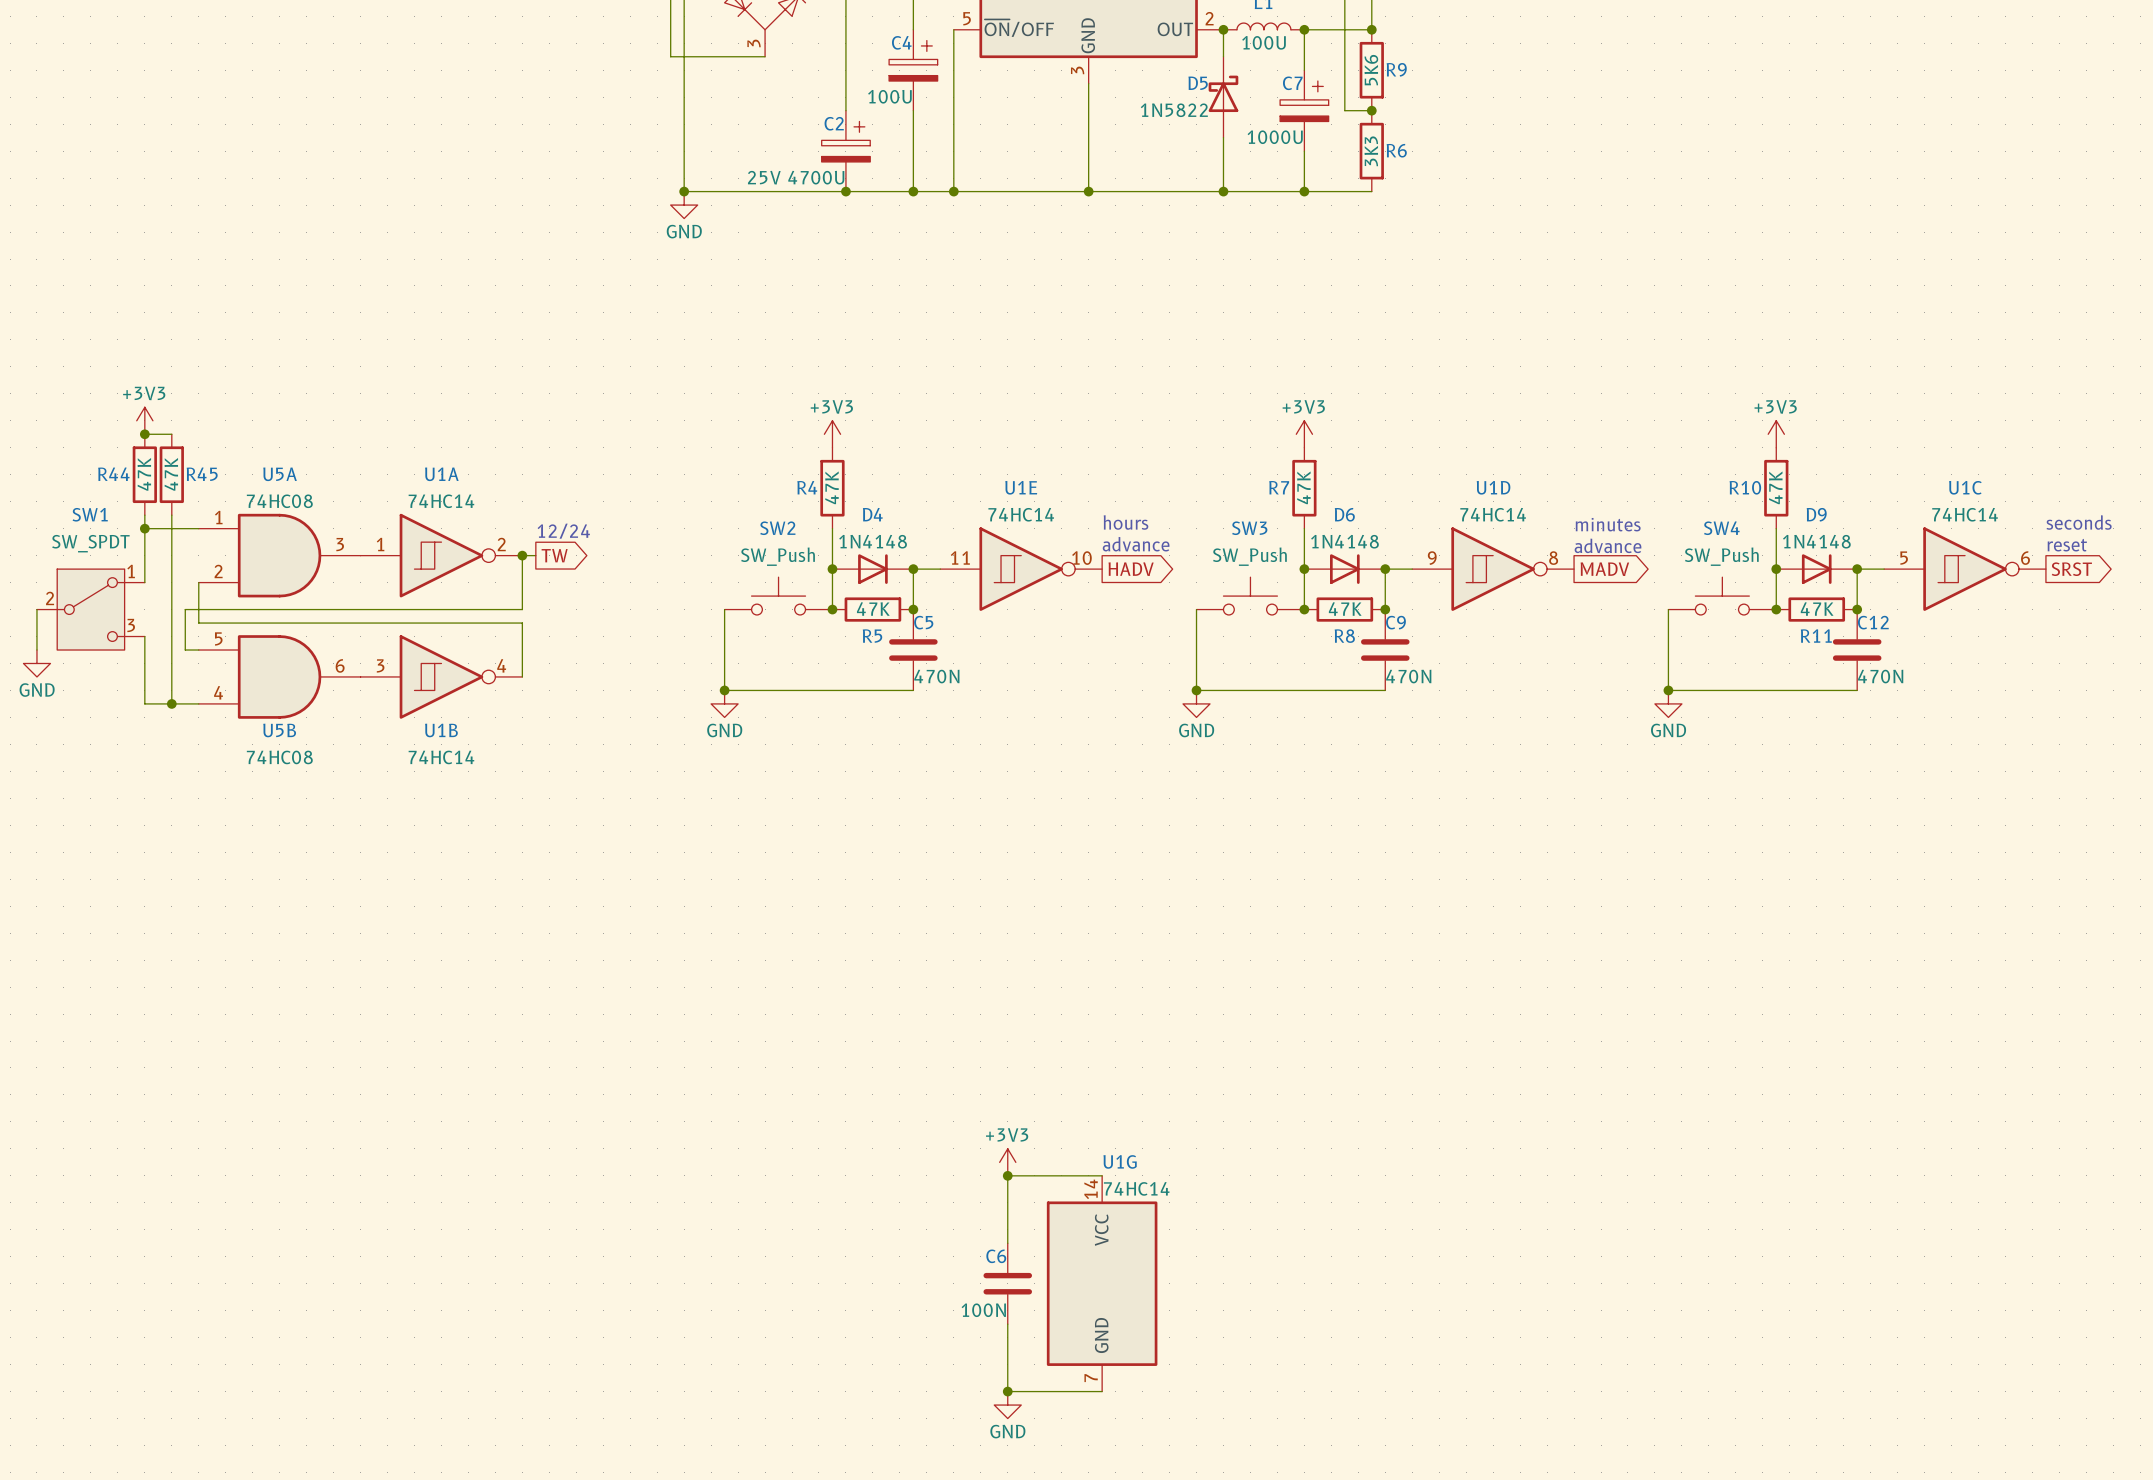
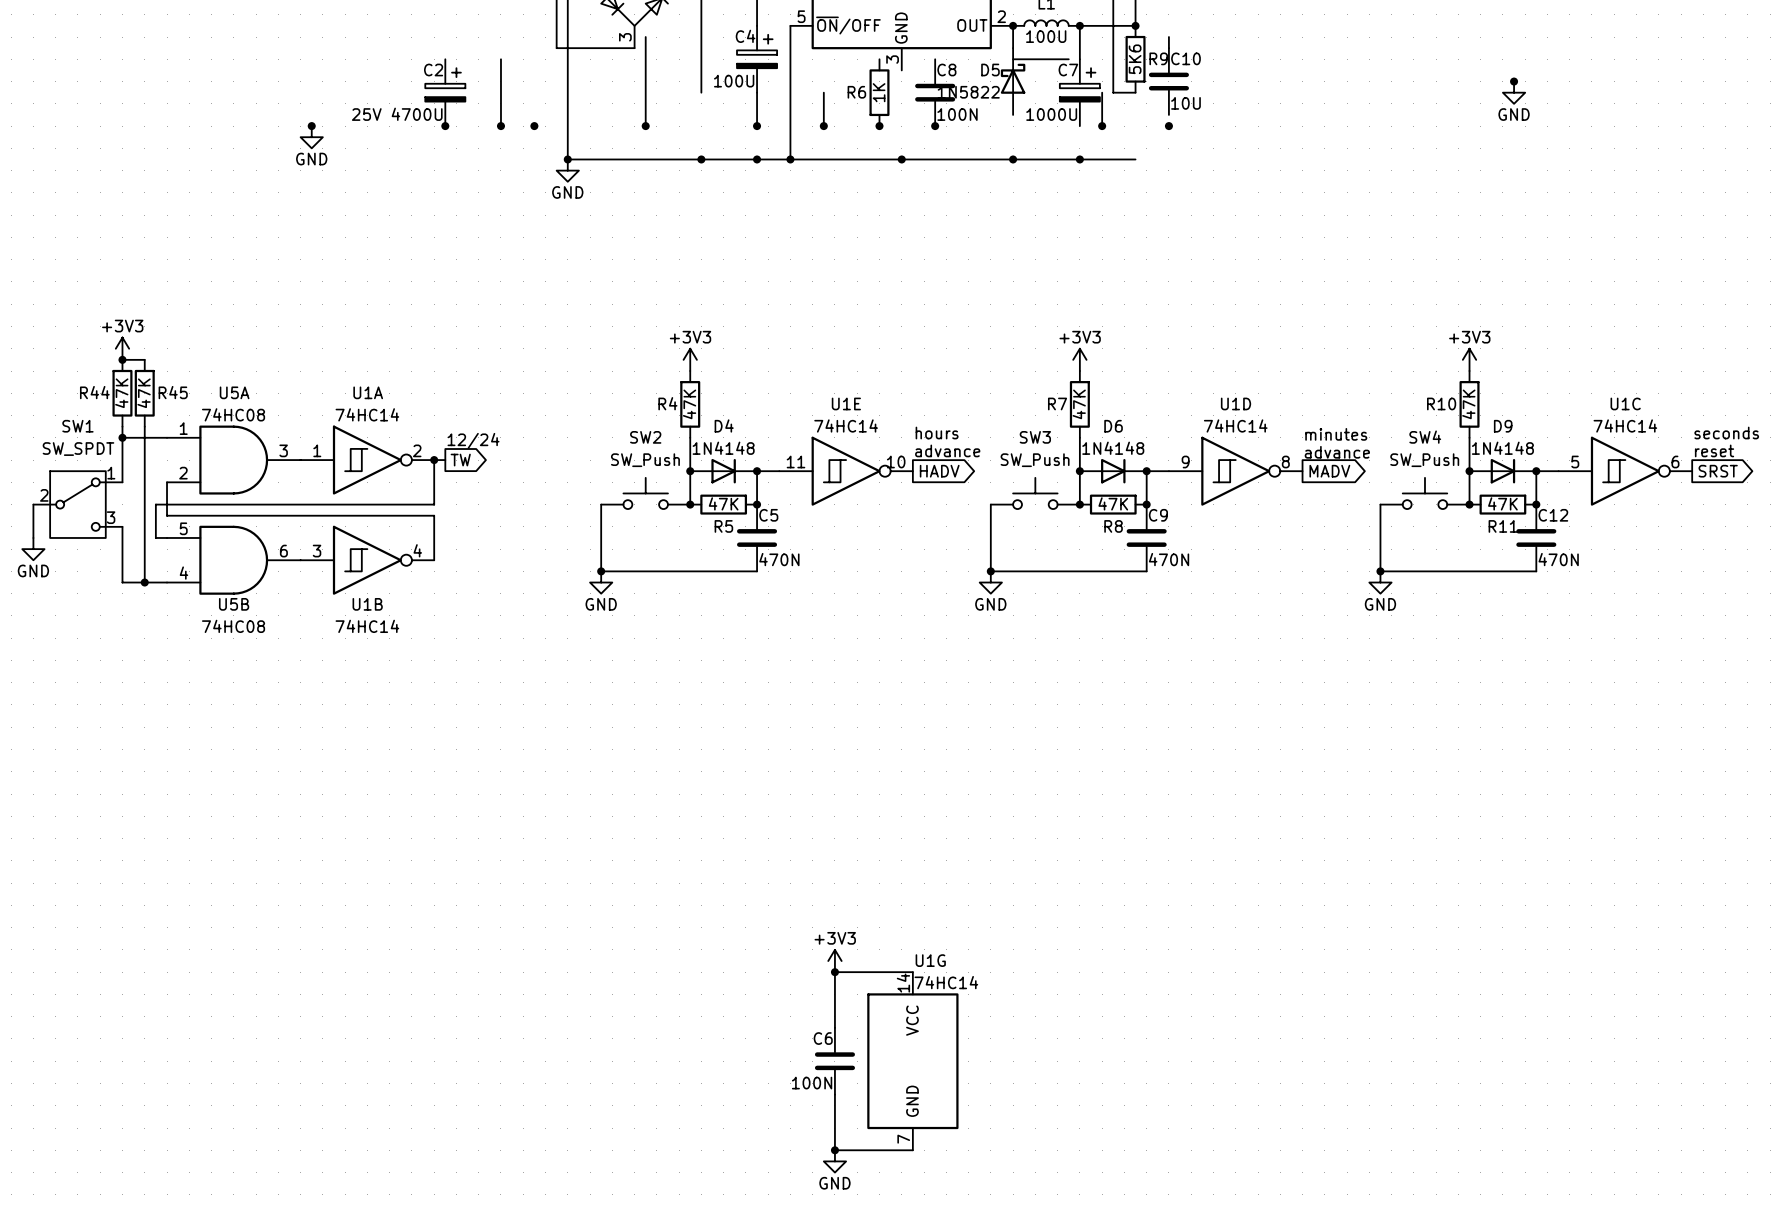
wire: none -> (645, 37) (645, 126)
wire: none -> (1168, 37) (1168, 48)
wire: none -> (500, 59) (500, 126)
wire: none -> (1013, 59) (1068, 59)
wire: (1088, 83) (1088, 191) -> none
C10: none -> 10U (1168, 81)
junction: none -> (1514, 81)
C8: none -> 100N (935, 92)
junction: (1371, 110) -> none
power symbol: none -> GND (1514, 92)
wire: (1223, 137) (1223, 191) -> none
R6 name position: R6 (1396, 150) -> R6 (856, 92)
junction: none -> (311, 126)
junction: none -> (445, 126)
junction: none -> (500, 126)
junction: none -> (534, 126)
junction: none -> (645, 126)
C2 position: (845, 151) -> (445, 92)
wire: (913, 151) (913, 191) -> (823, 92) (823, 126)
junction: none -> (757, 126)
junction: none -> (823, 126)
junction: none -> (879, 126)
junction: none -> (935, 126)
wire: (1304, 151) (1304, 191) -> (1102, 92) (1102, 126)
junction: none -> (1102, 126)
R6 position: (1371, 151) -> (879, 92)
R6 value: 3K3 (1371, 151) -> 1K (879, 92)
junction: none -> (1168, 126)
power symbol: none -> GND (311, 137)

